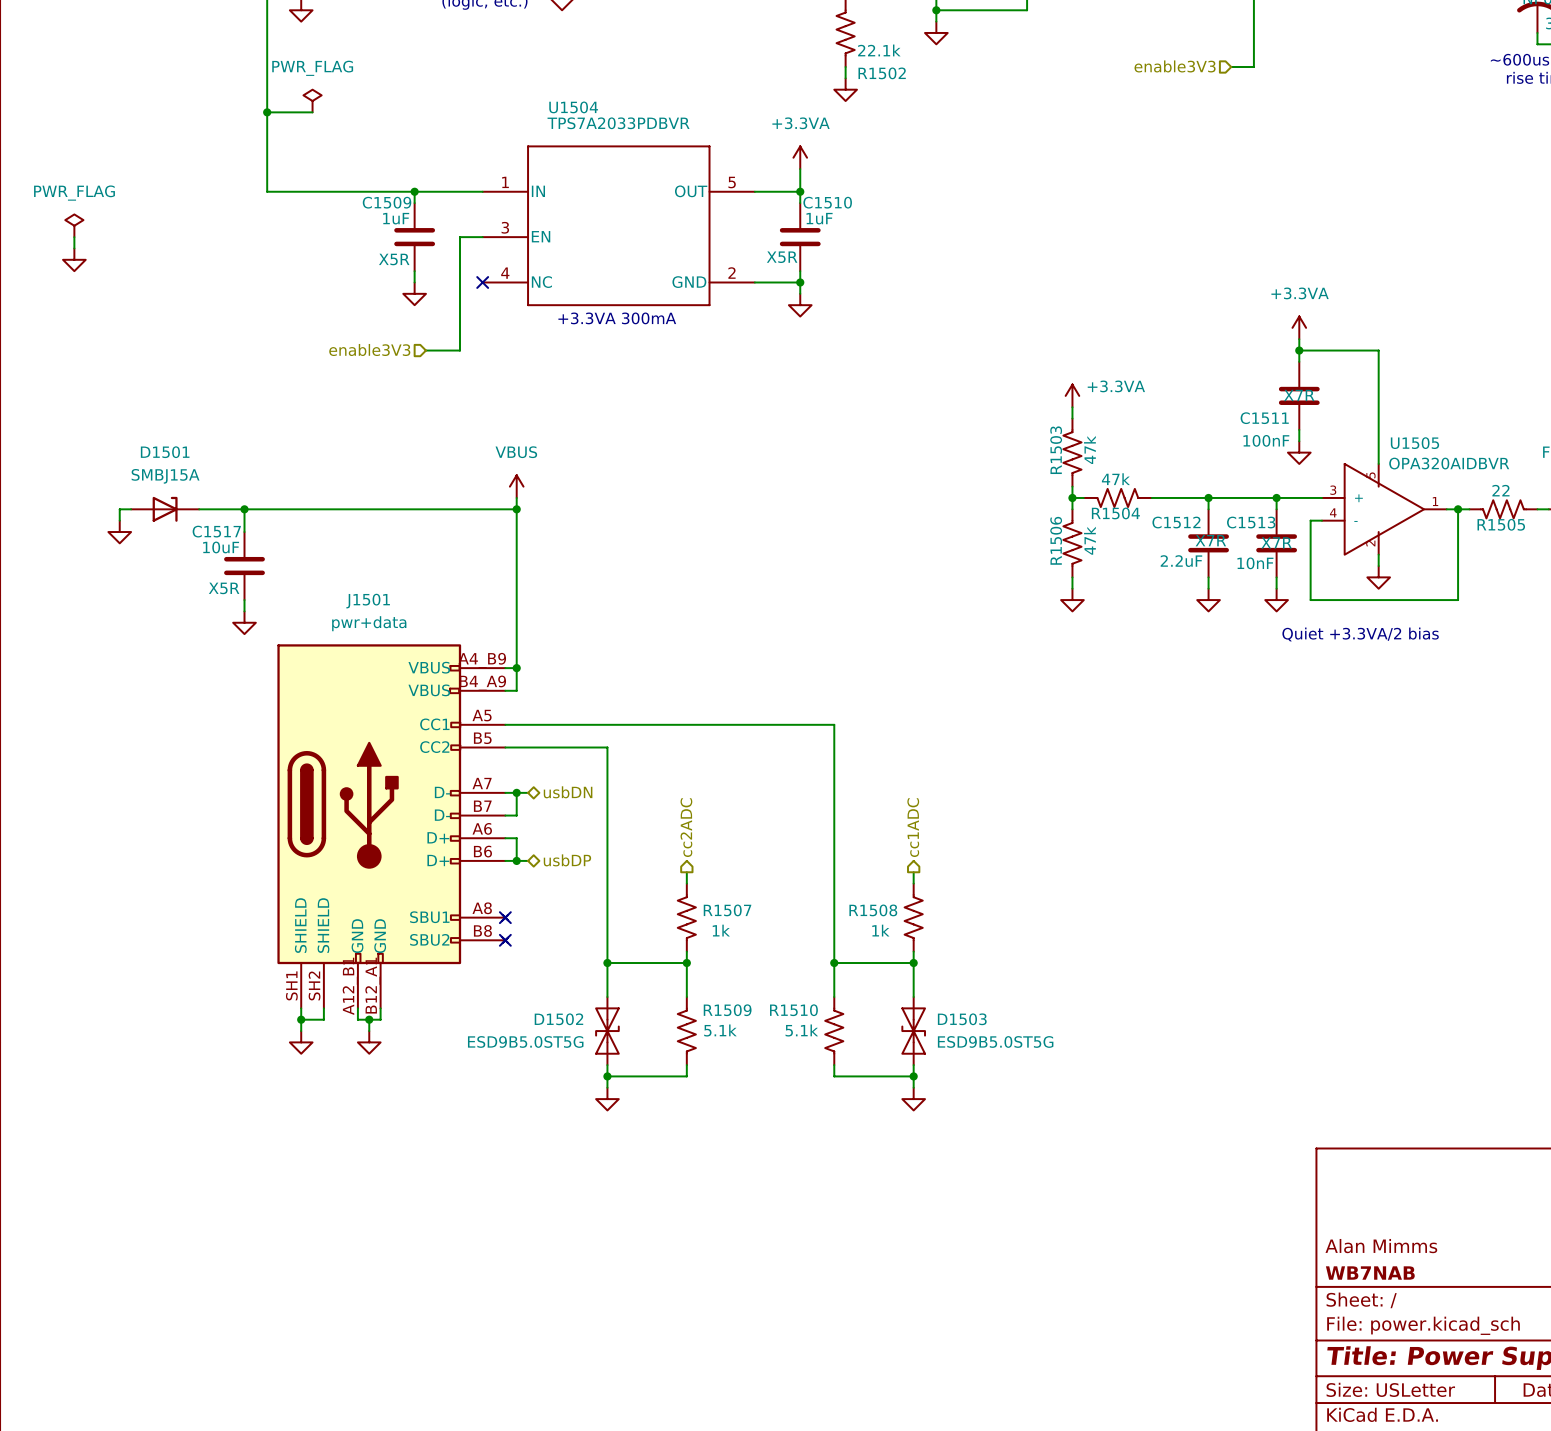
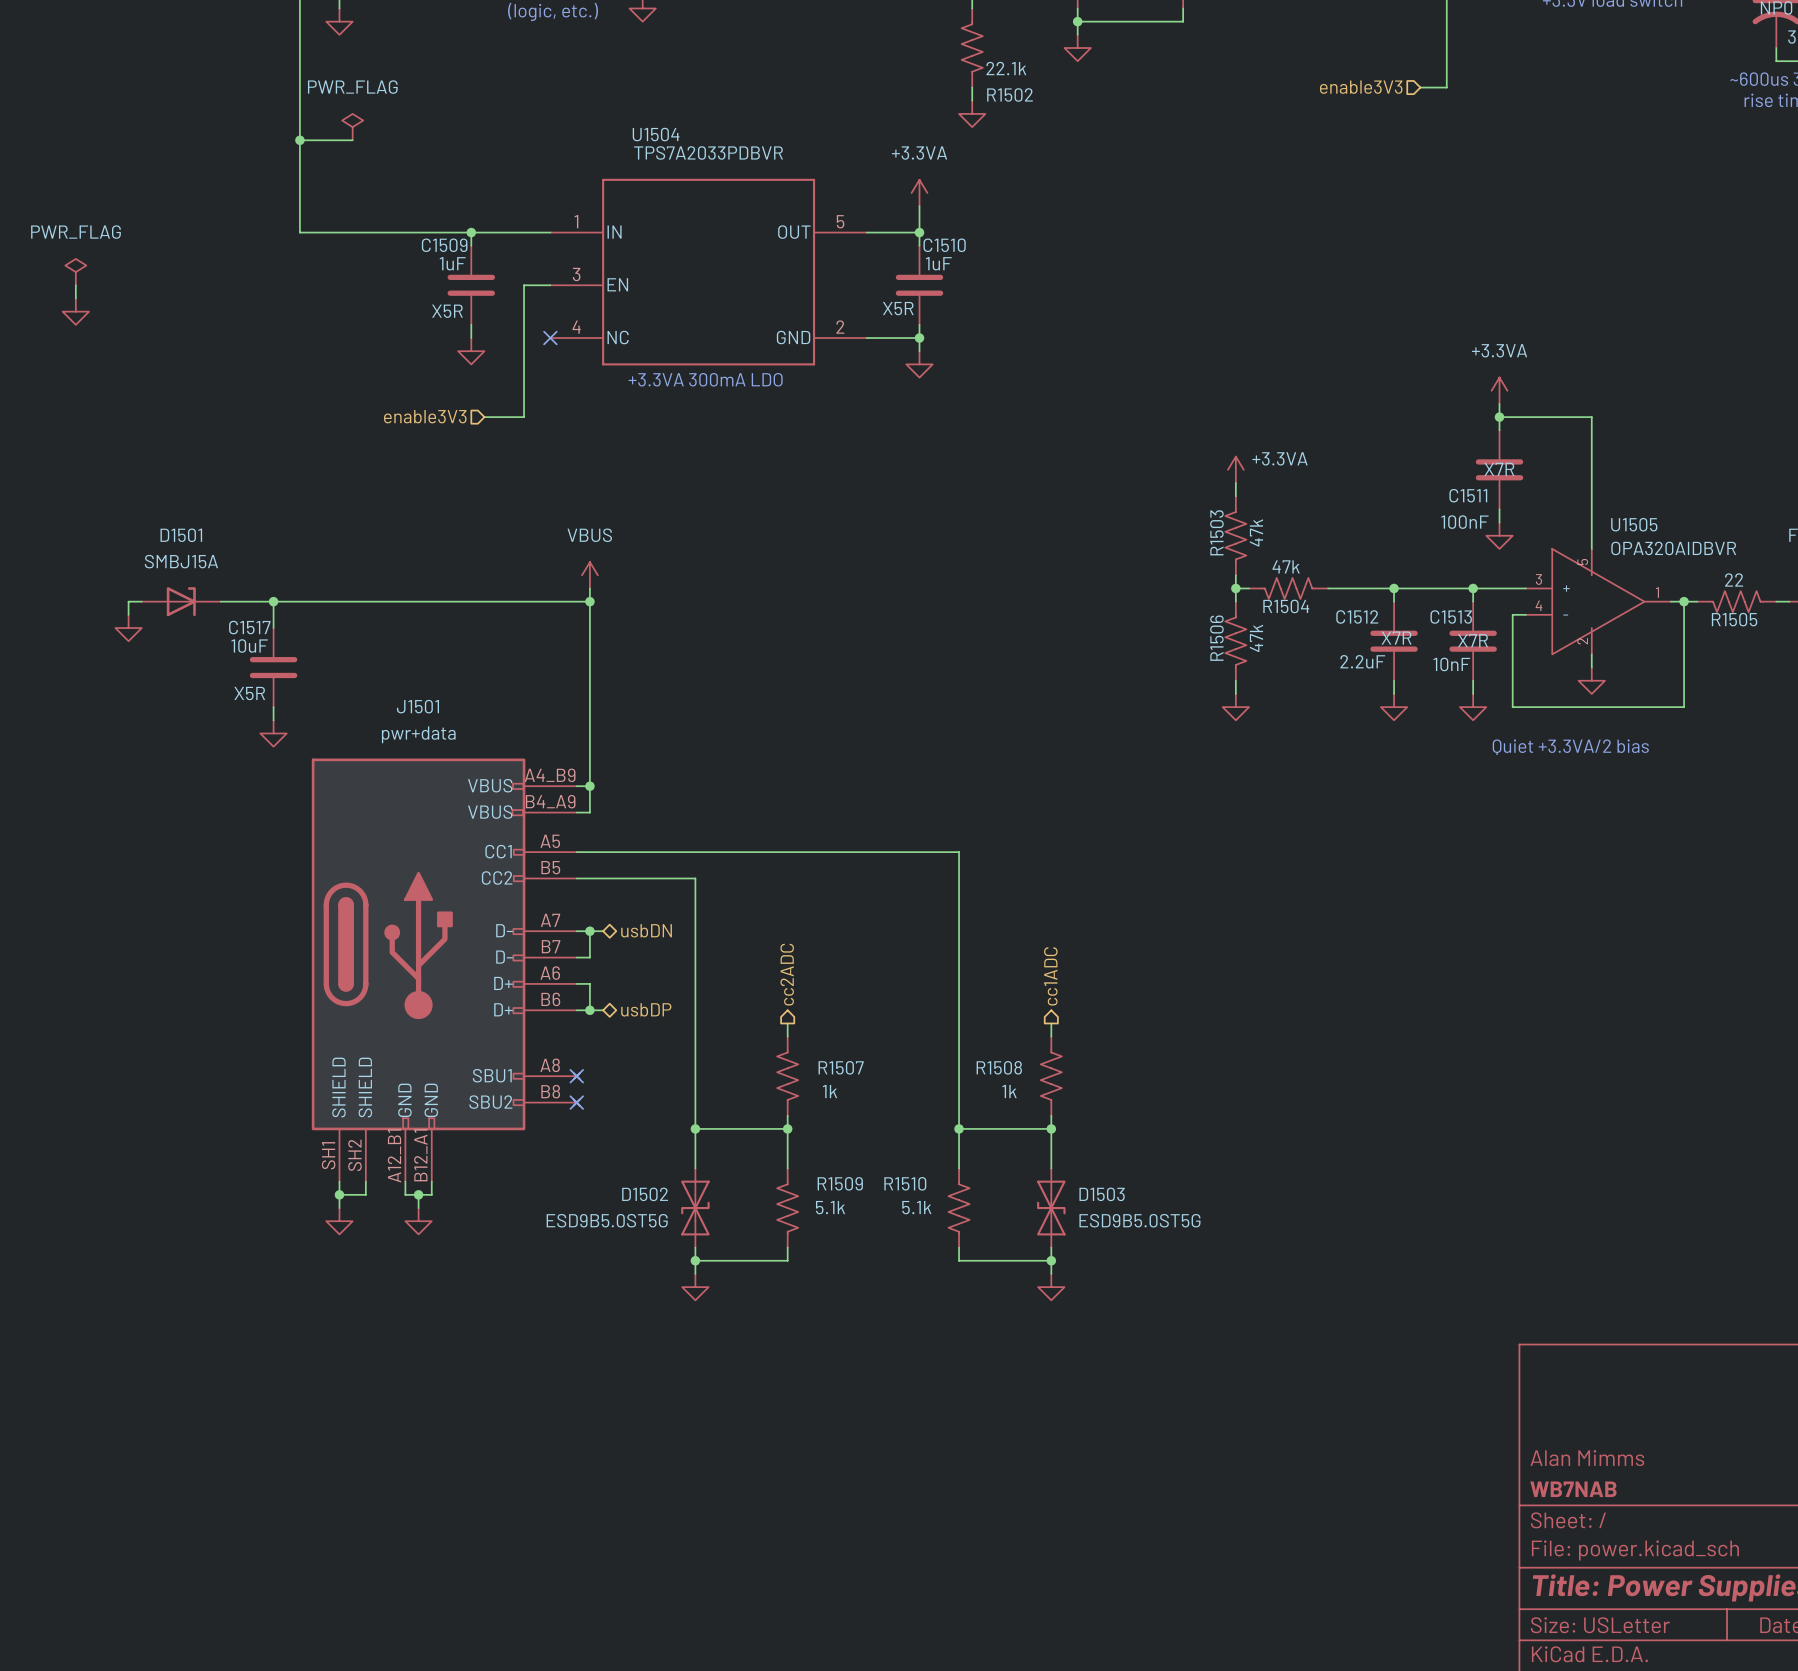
text: +3.3VA 300mA (617, 318) -> +3.3VA 300mA LDO (705, 379)

